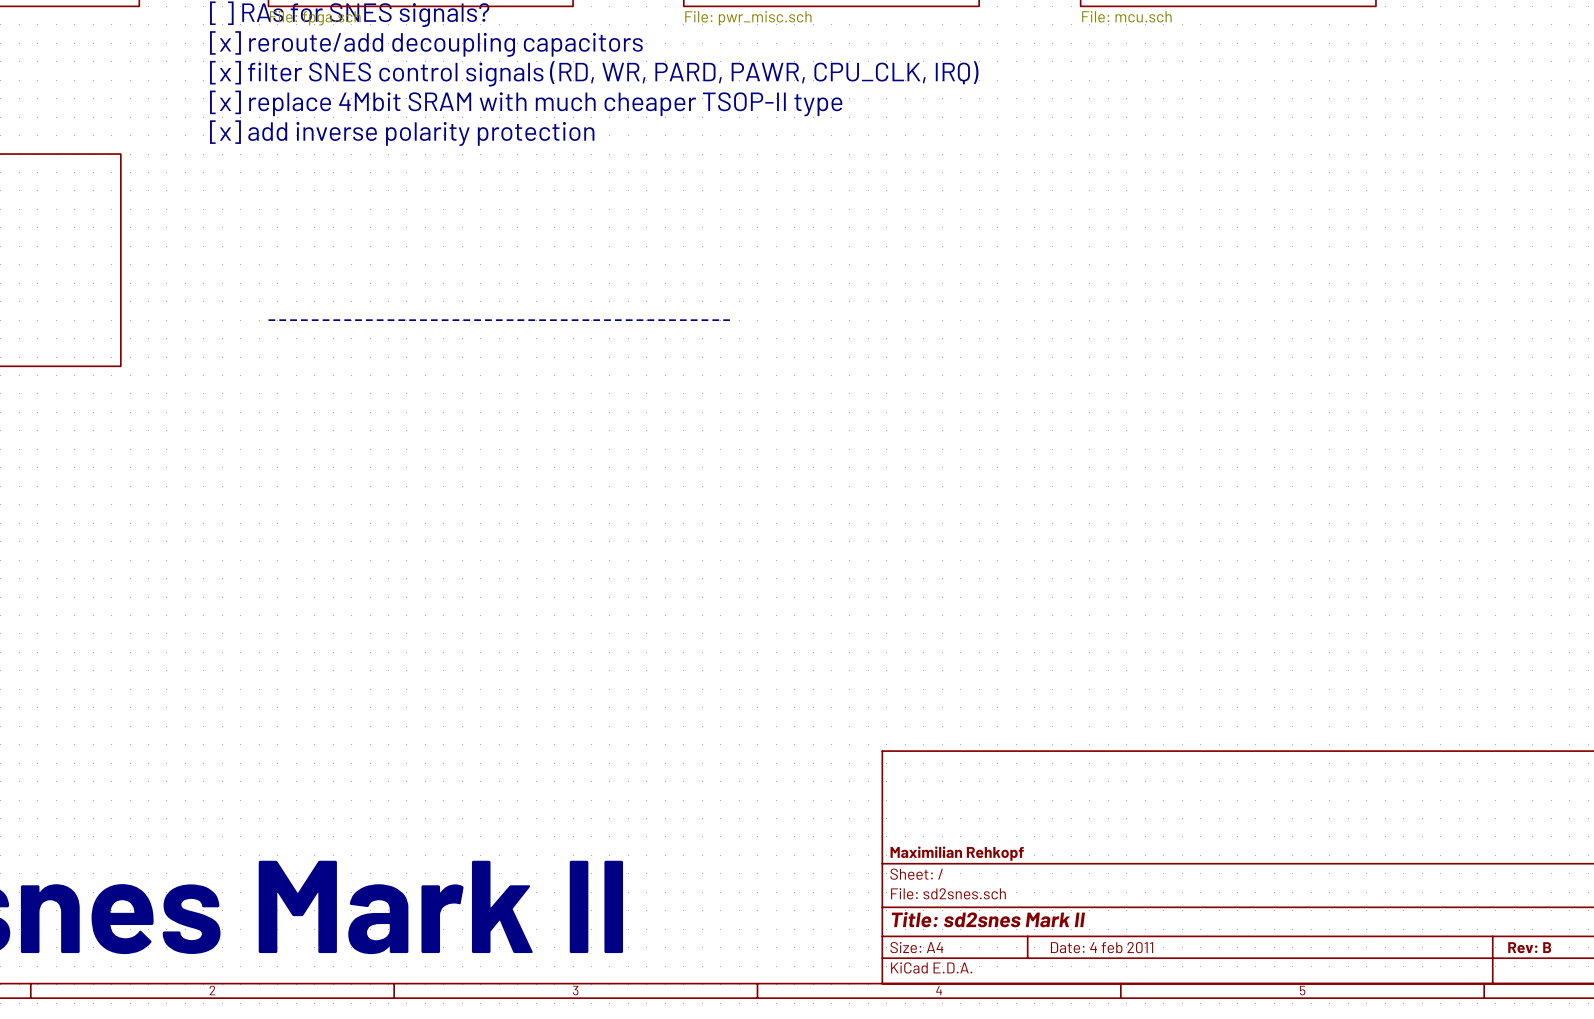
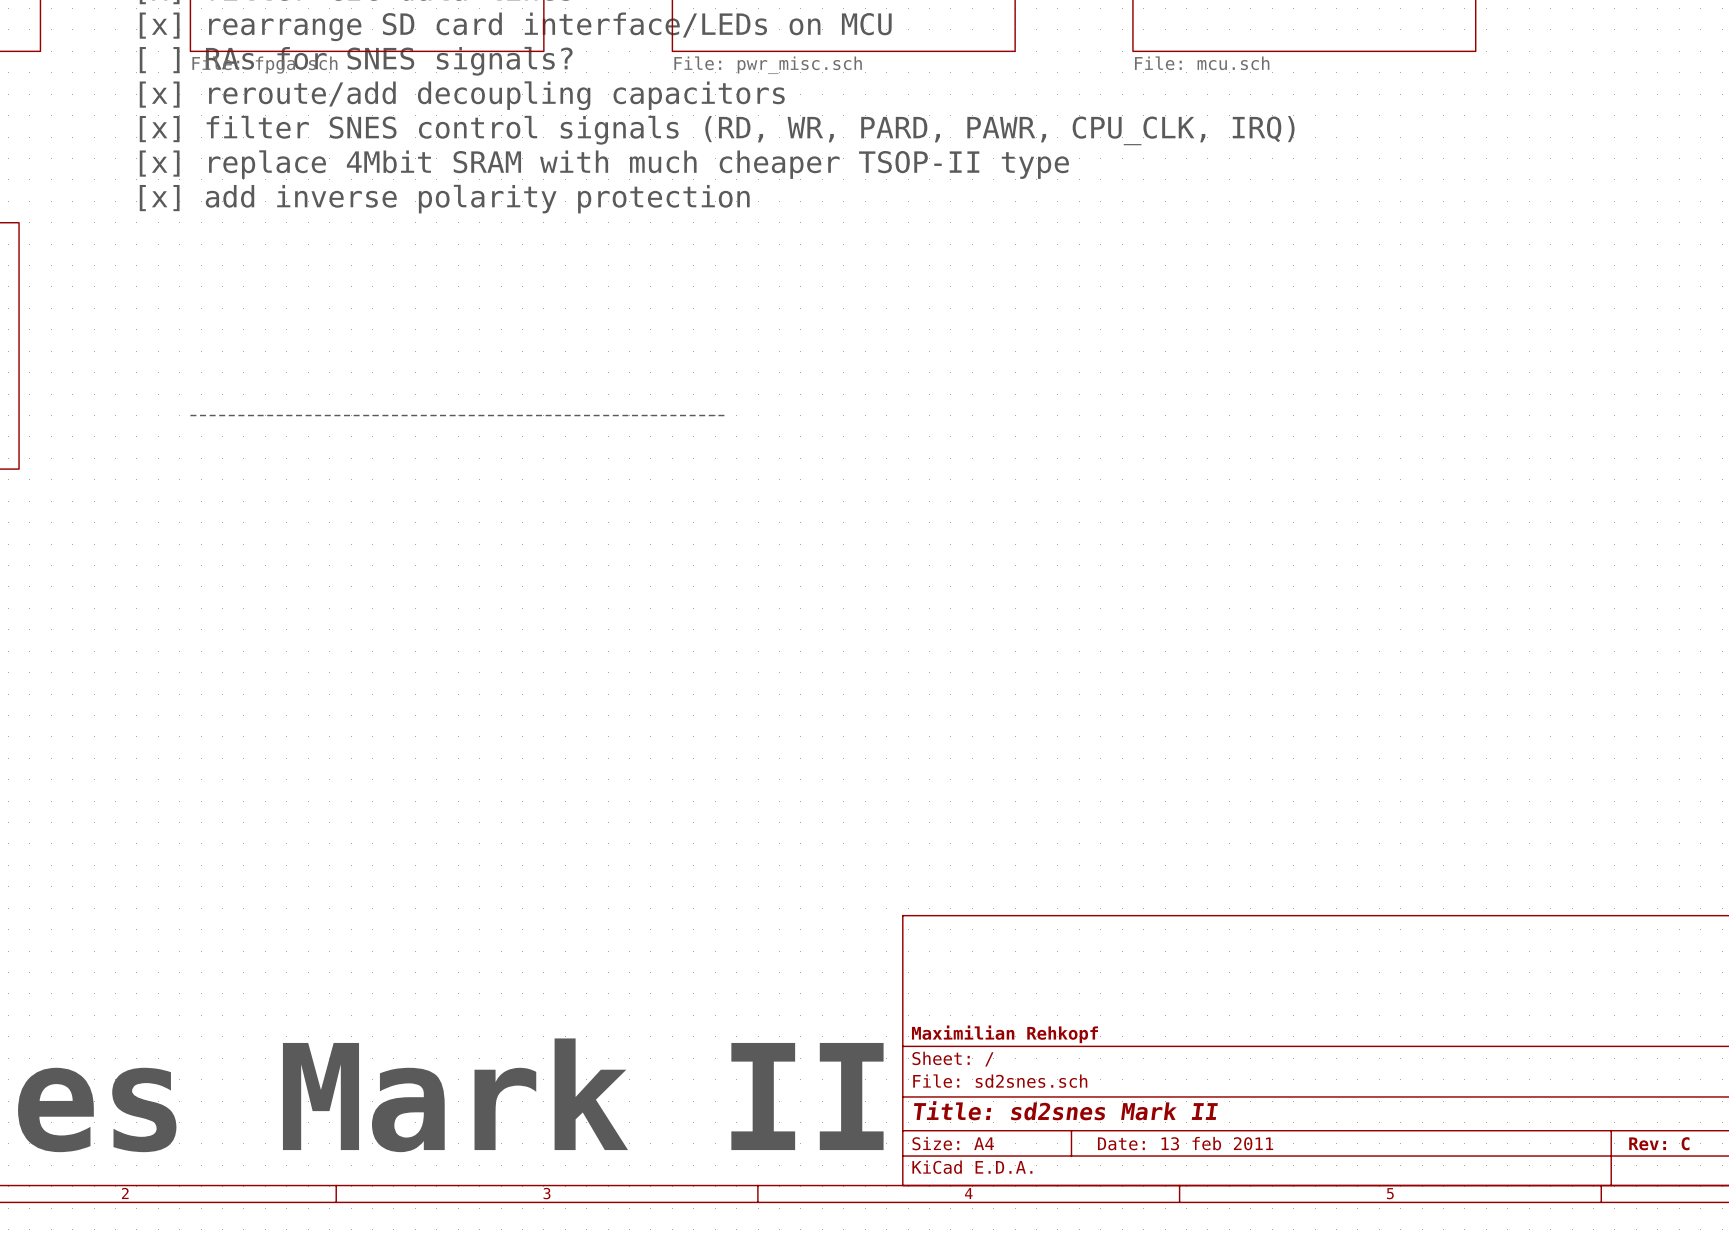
title block: Date: 4 feb 2011 (1102, 947) -> Date: 13 feb 2011 (1185, 1143)
title block: Rev: B (1529, 947) -> Rev: C (1659, 1143)

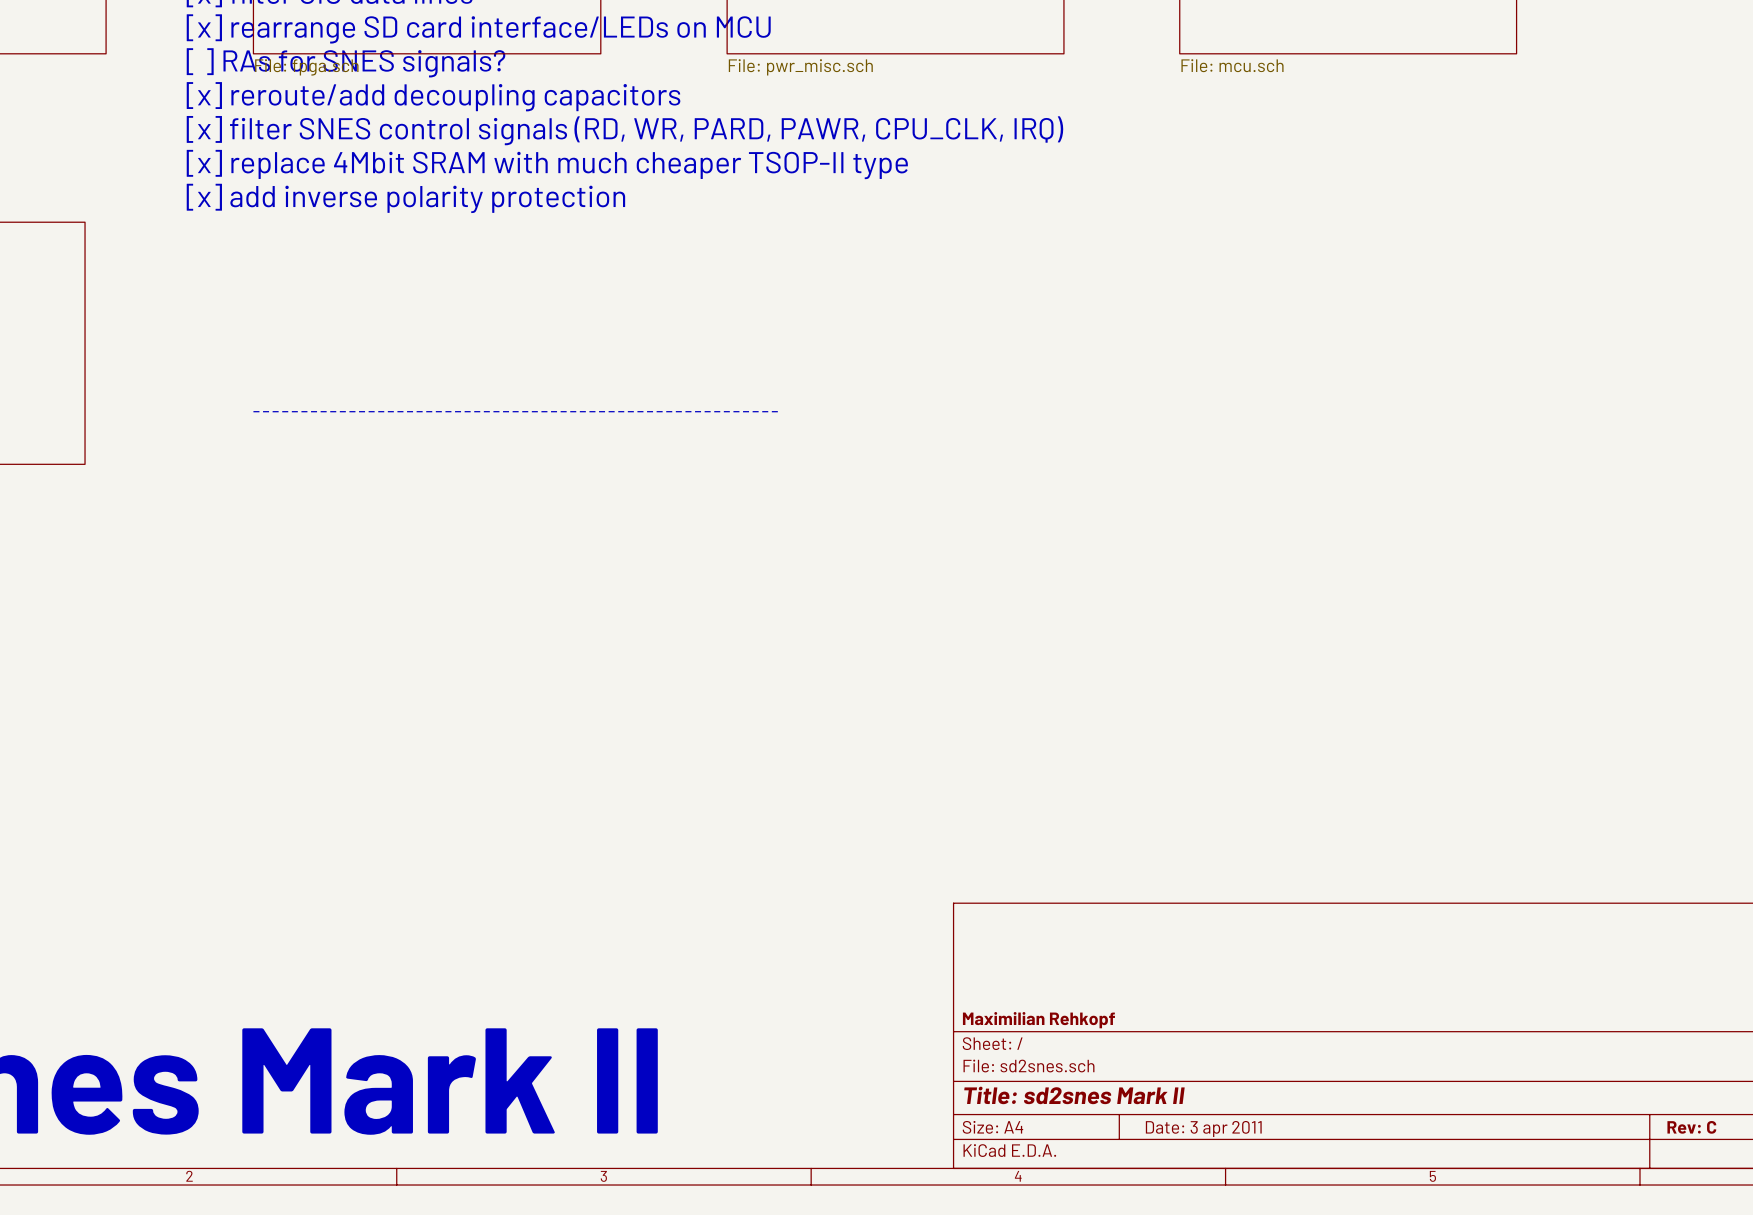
title block: Date: 13 feb 2011 (1185, 1143) -> Date: 3 apr 2011 (1203, 1128)

